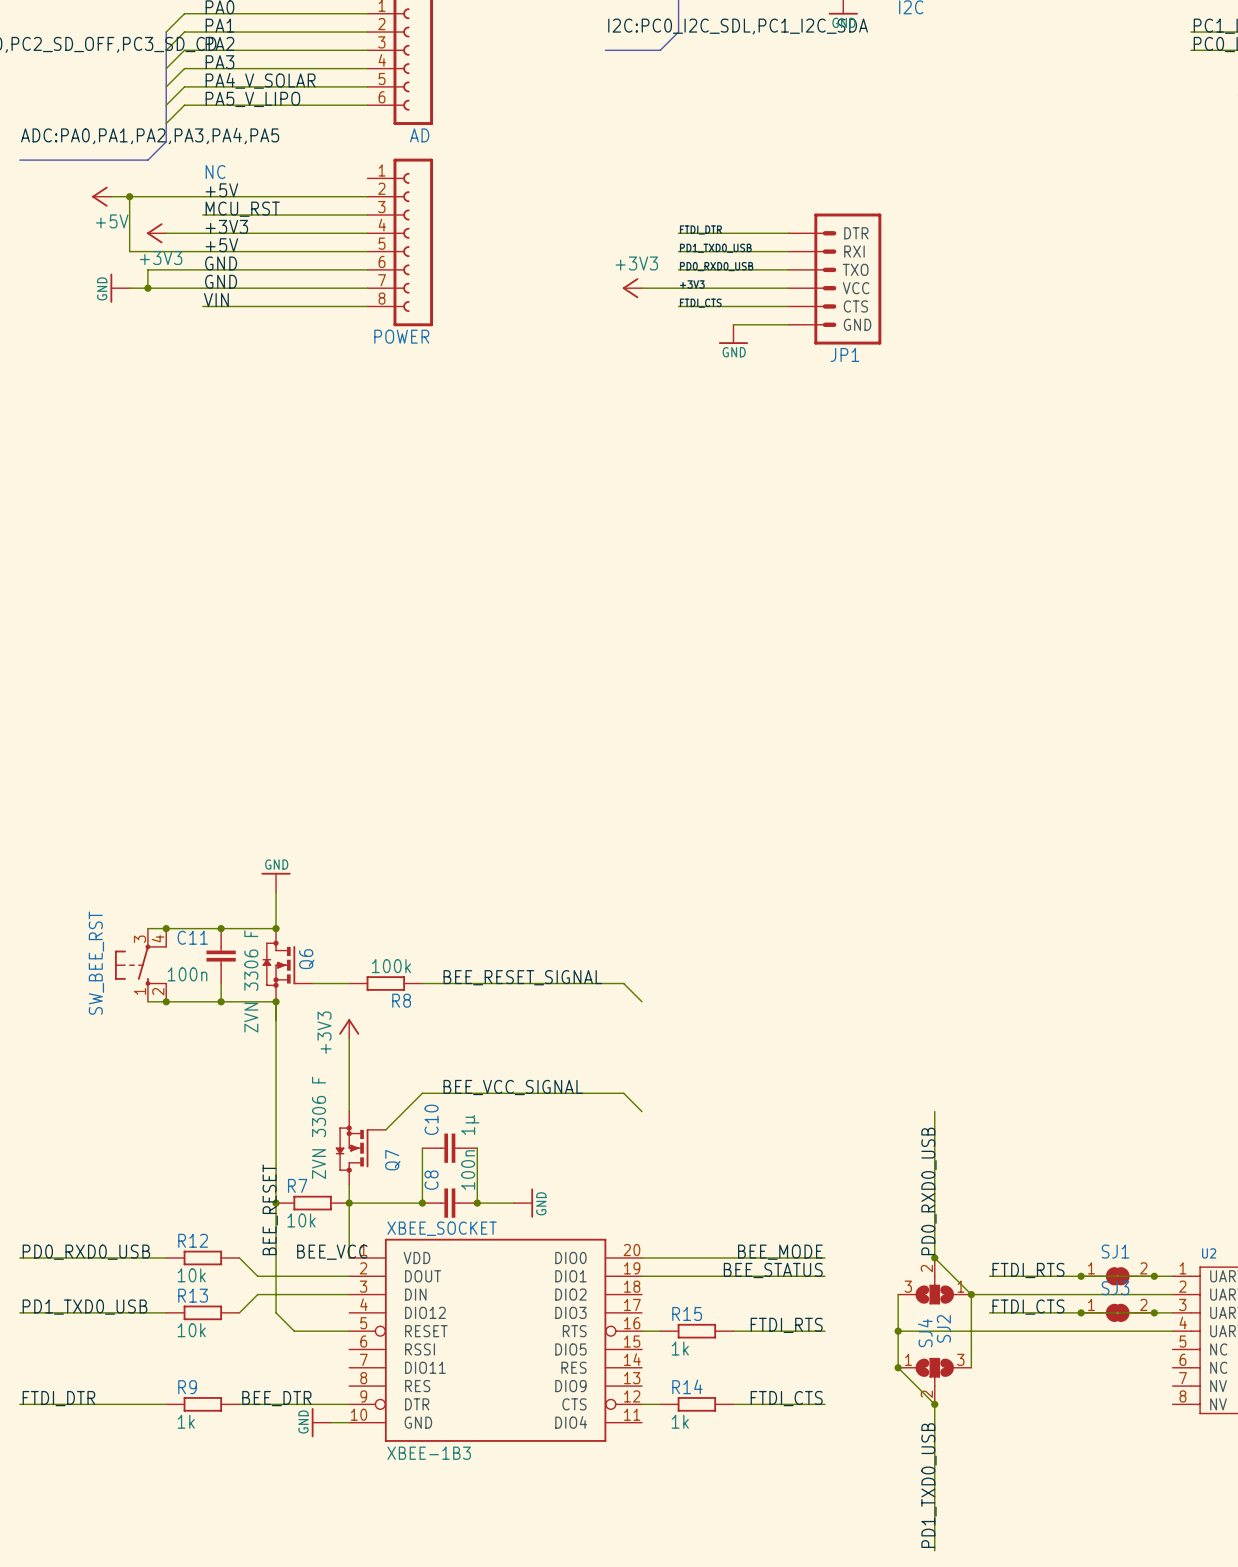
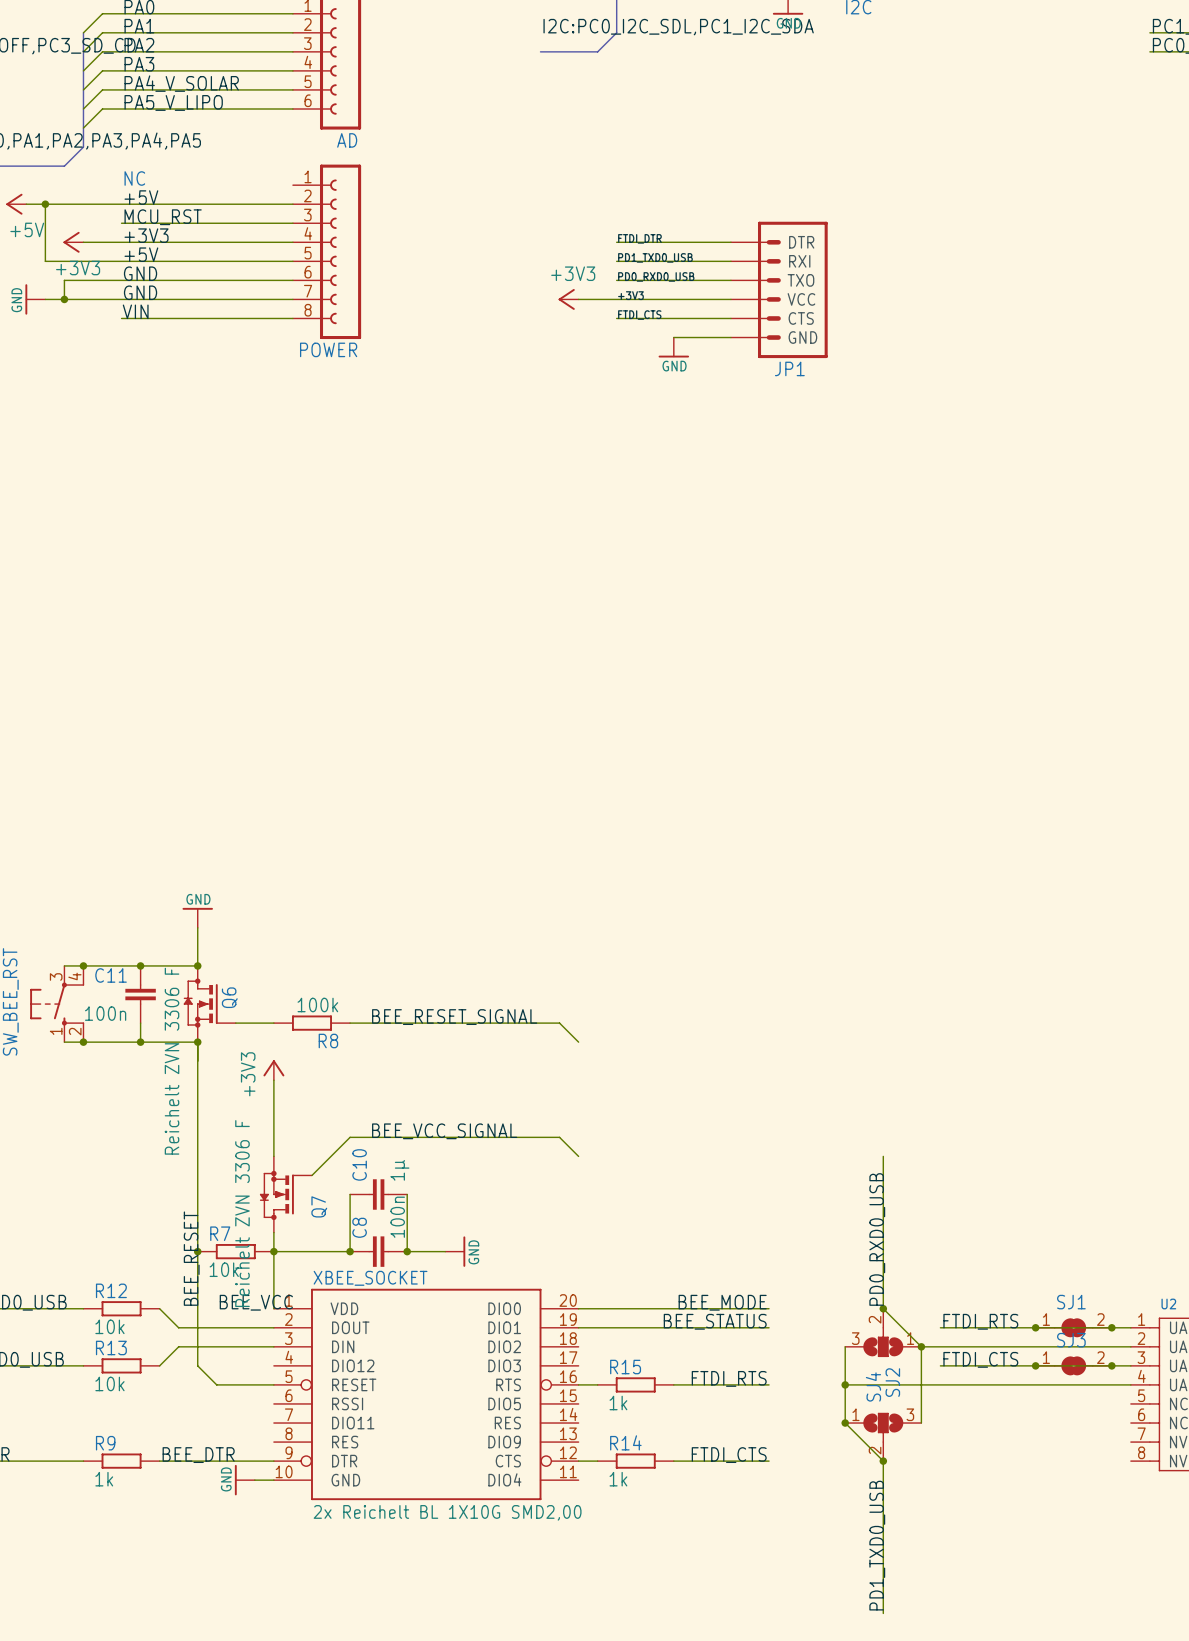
Q6 value: ZVN 3306 F (251, 981) -> Reichelt ZVN 3306 F (172, 1061)
Q7 value: ZVN 3306 F (319, 1127) -> Reichelt ZVN 3306 F (242, 1213)
XBEE_SOCKET value: XBEE-1B3 (429, 1453) -> 2x Reichelt BL 1X10G SMD2,00 (447, 1512)

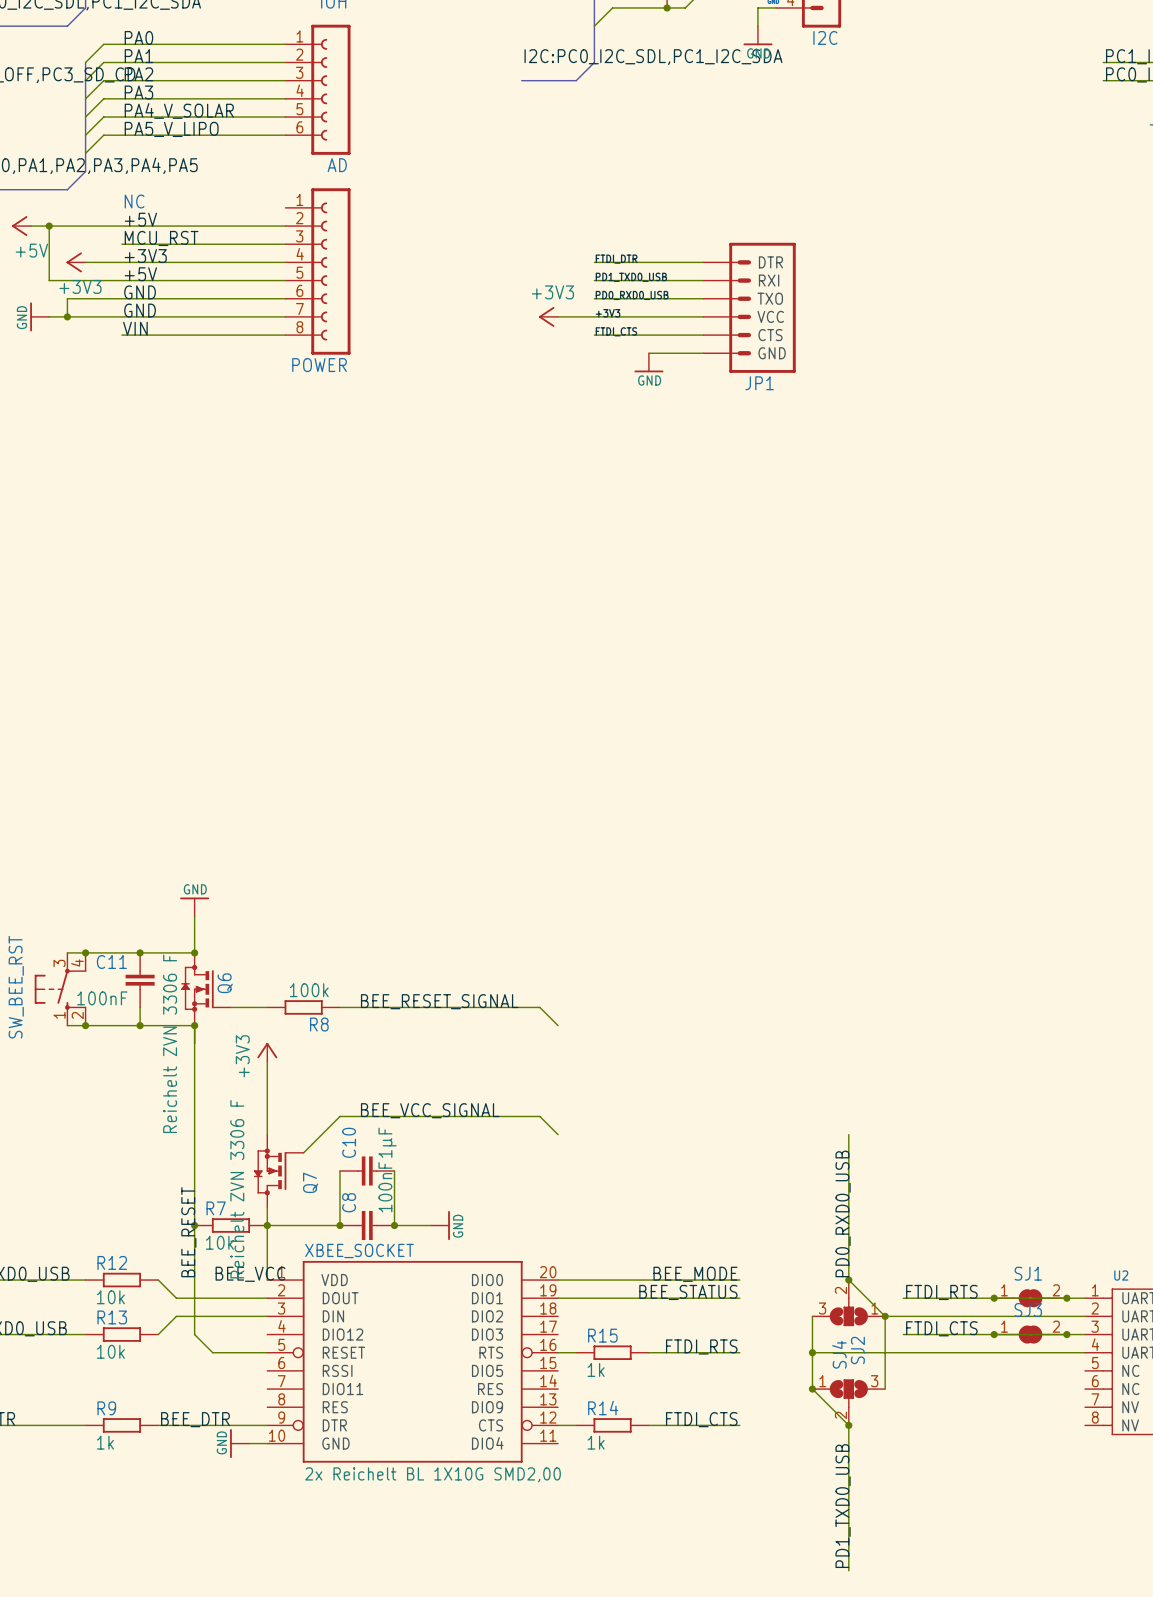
C11 value: 100n (105, 1013) -> 100nF (102, 998)
C10 value: 1µ (399, 1170) -> 1µF (387, 1142)
C8 value: 100n (397, 1217) -> 100nF (385, 1187)

